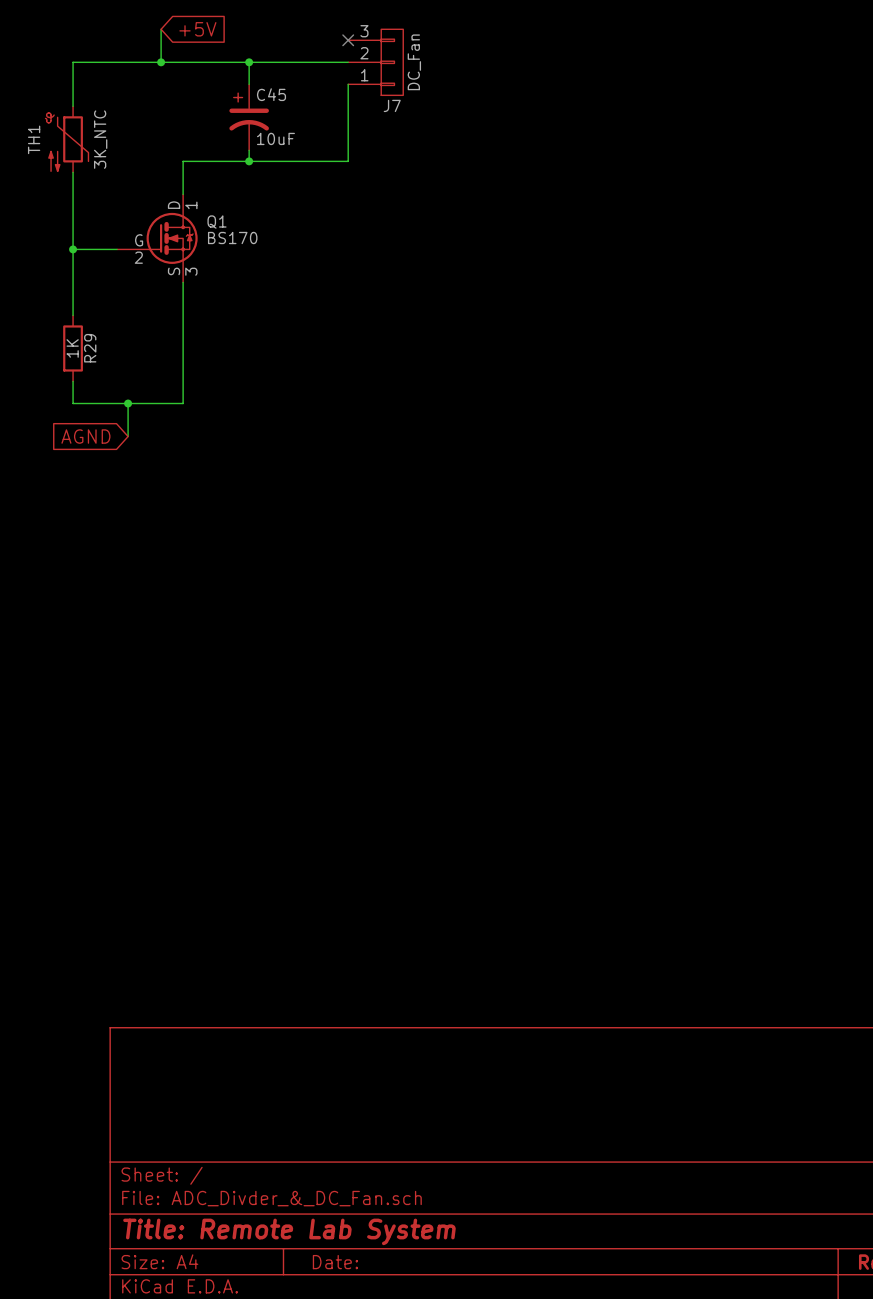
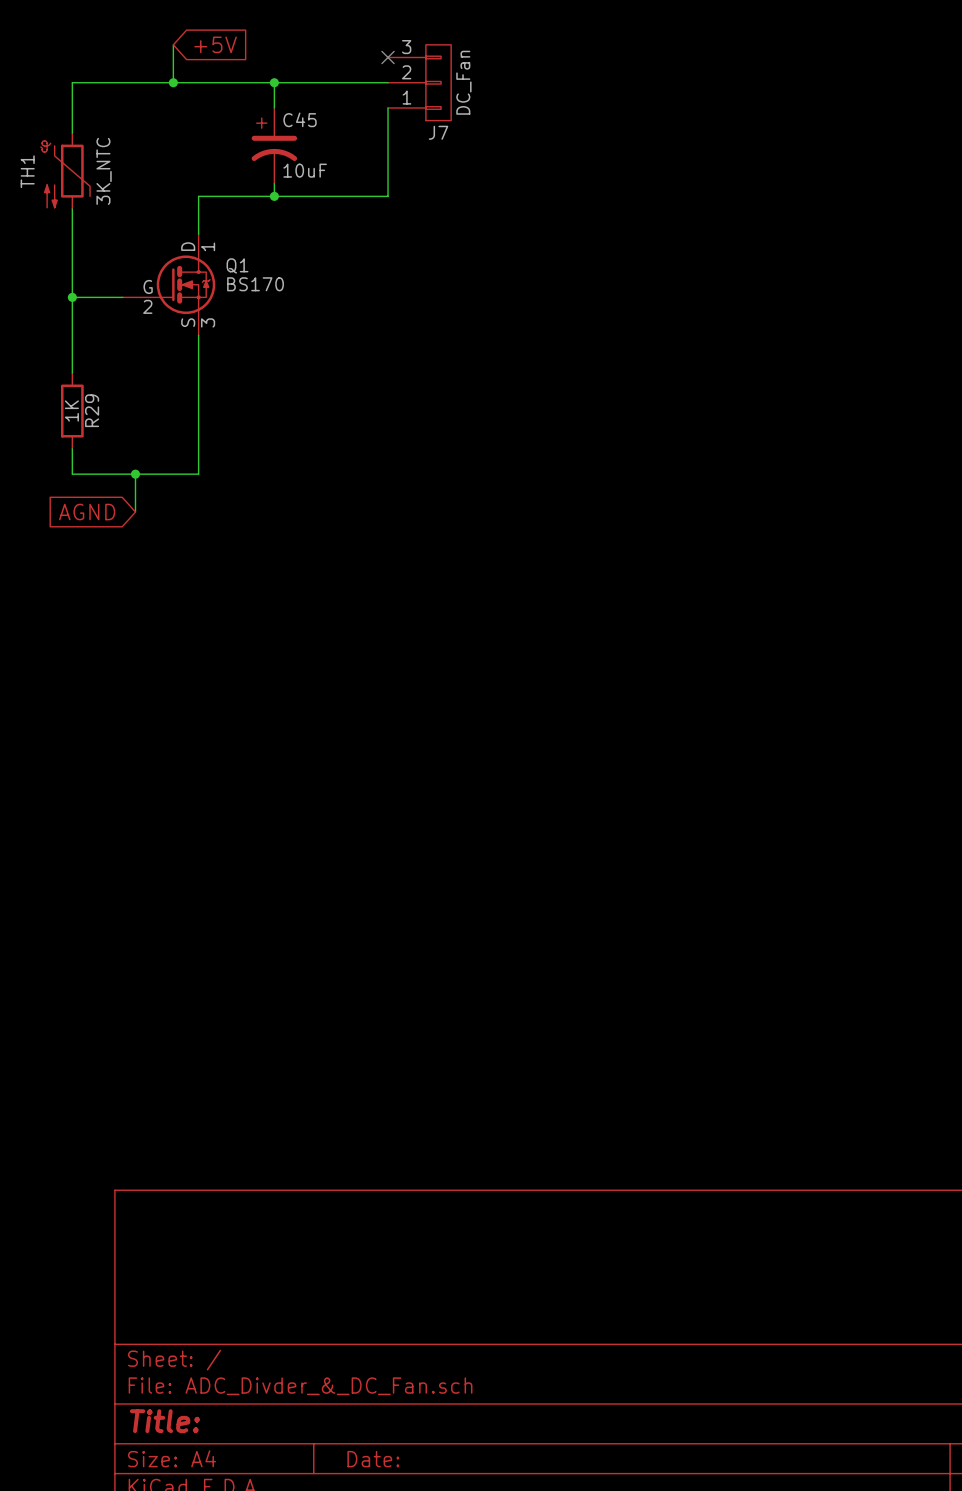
title block: Title: Remote Lab System (289, 1231) -> Title: (164, 1421)

